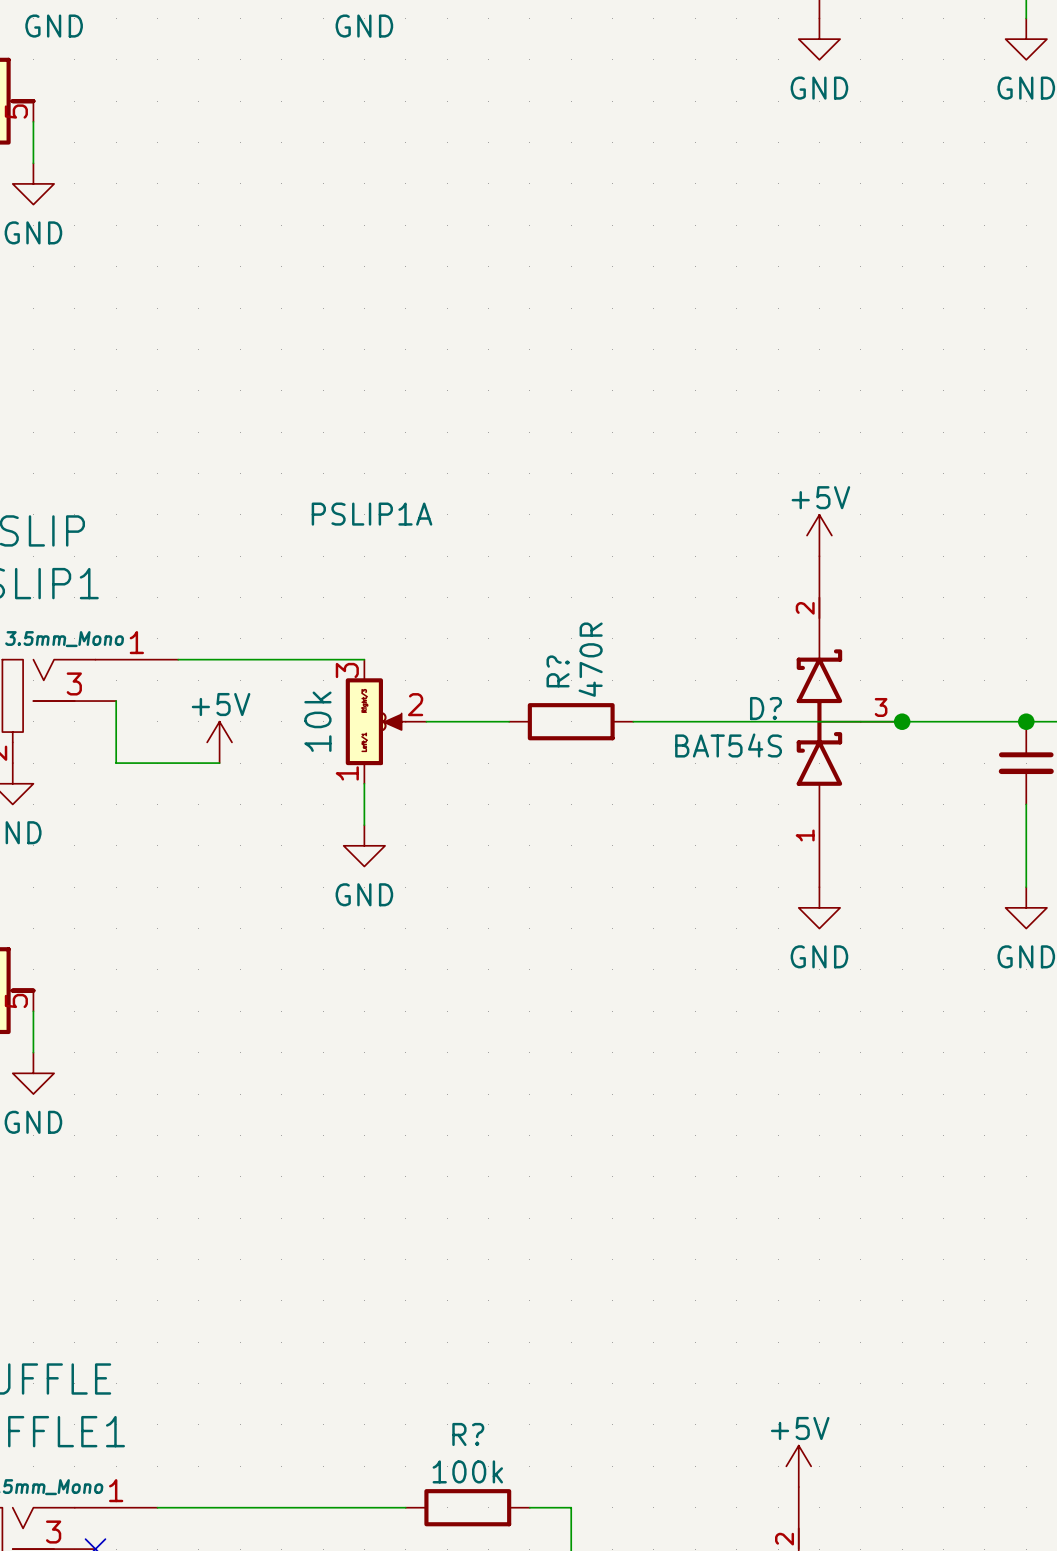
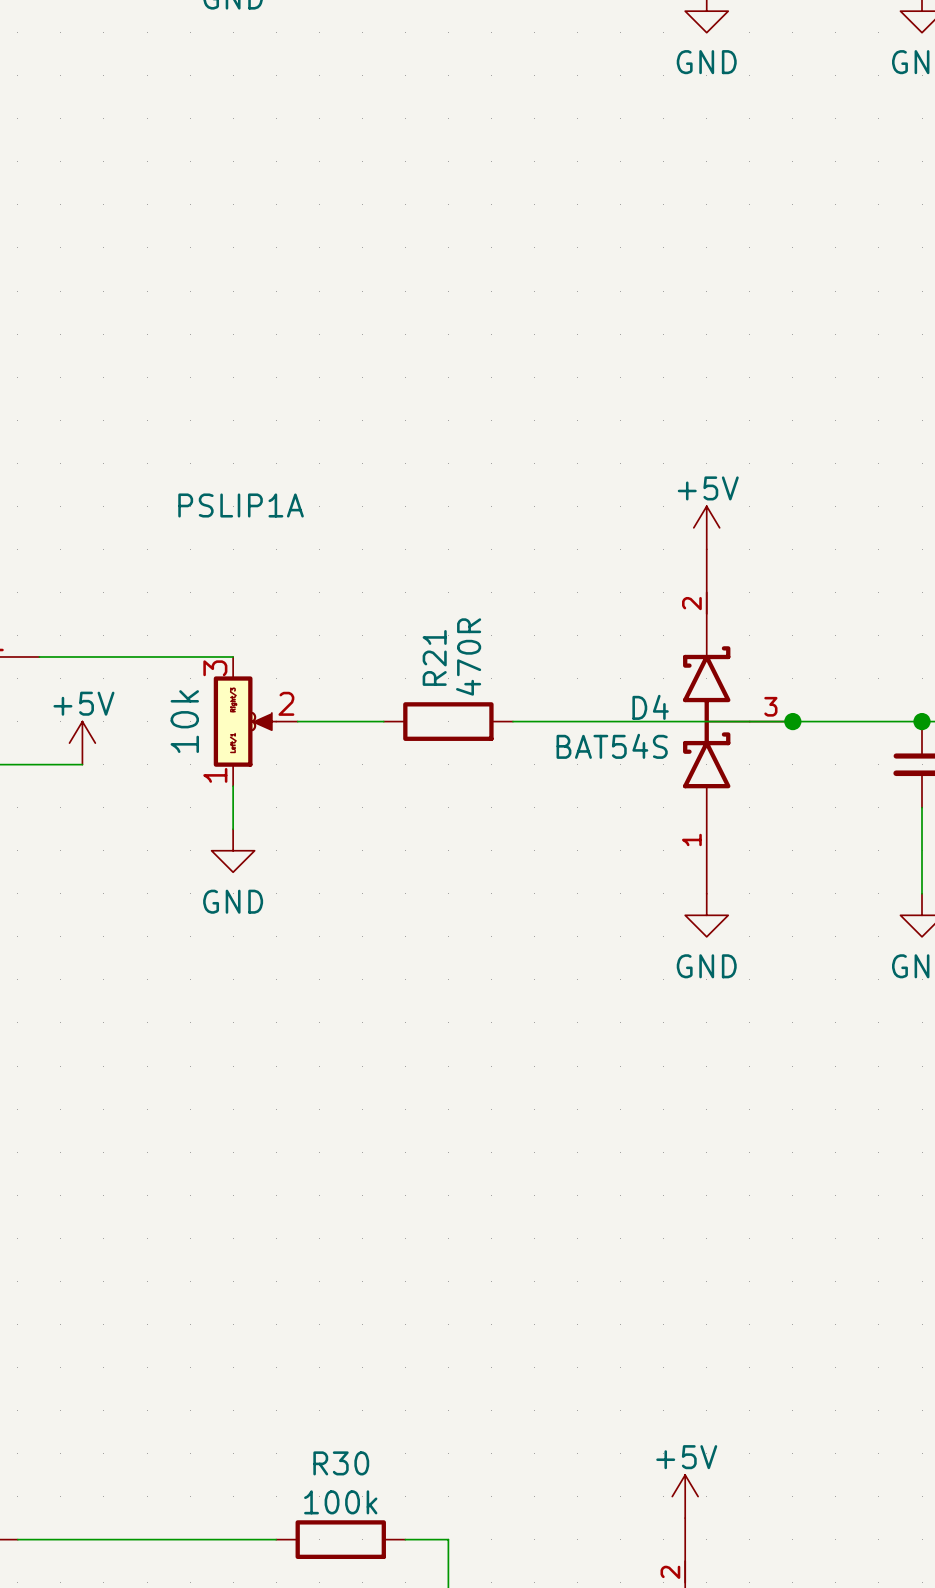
R? name: R? (558, 671) -> R21 (434, 657)
D? name: D? (765, 708) -> D4 (650, 707)
R? name: R? (468, 1434) -> R30 (341, 1463)

